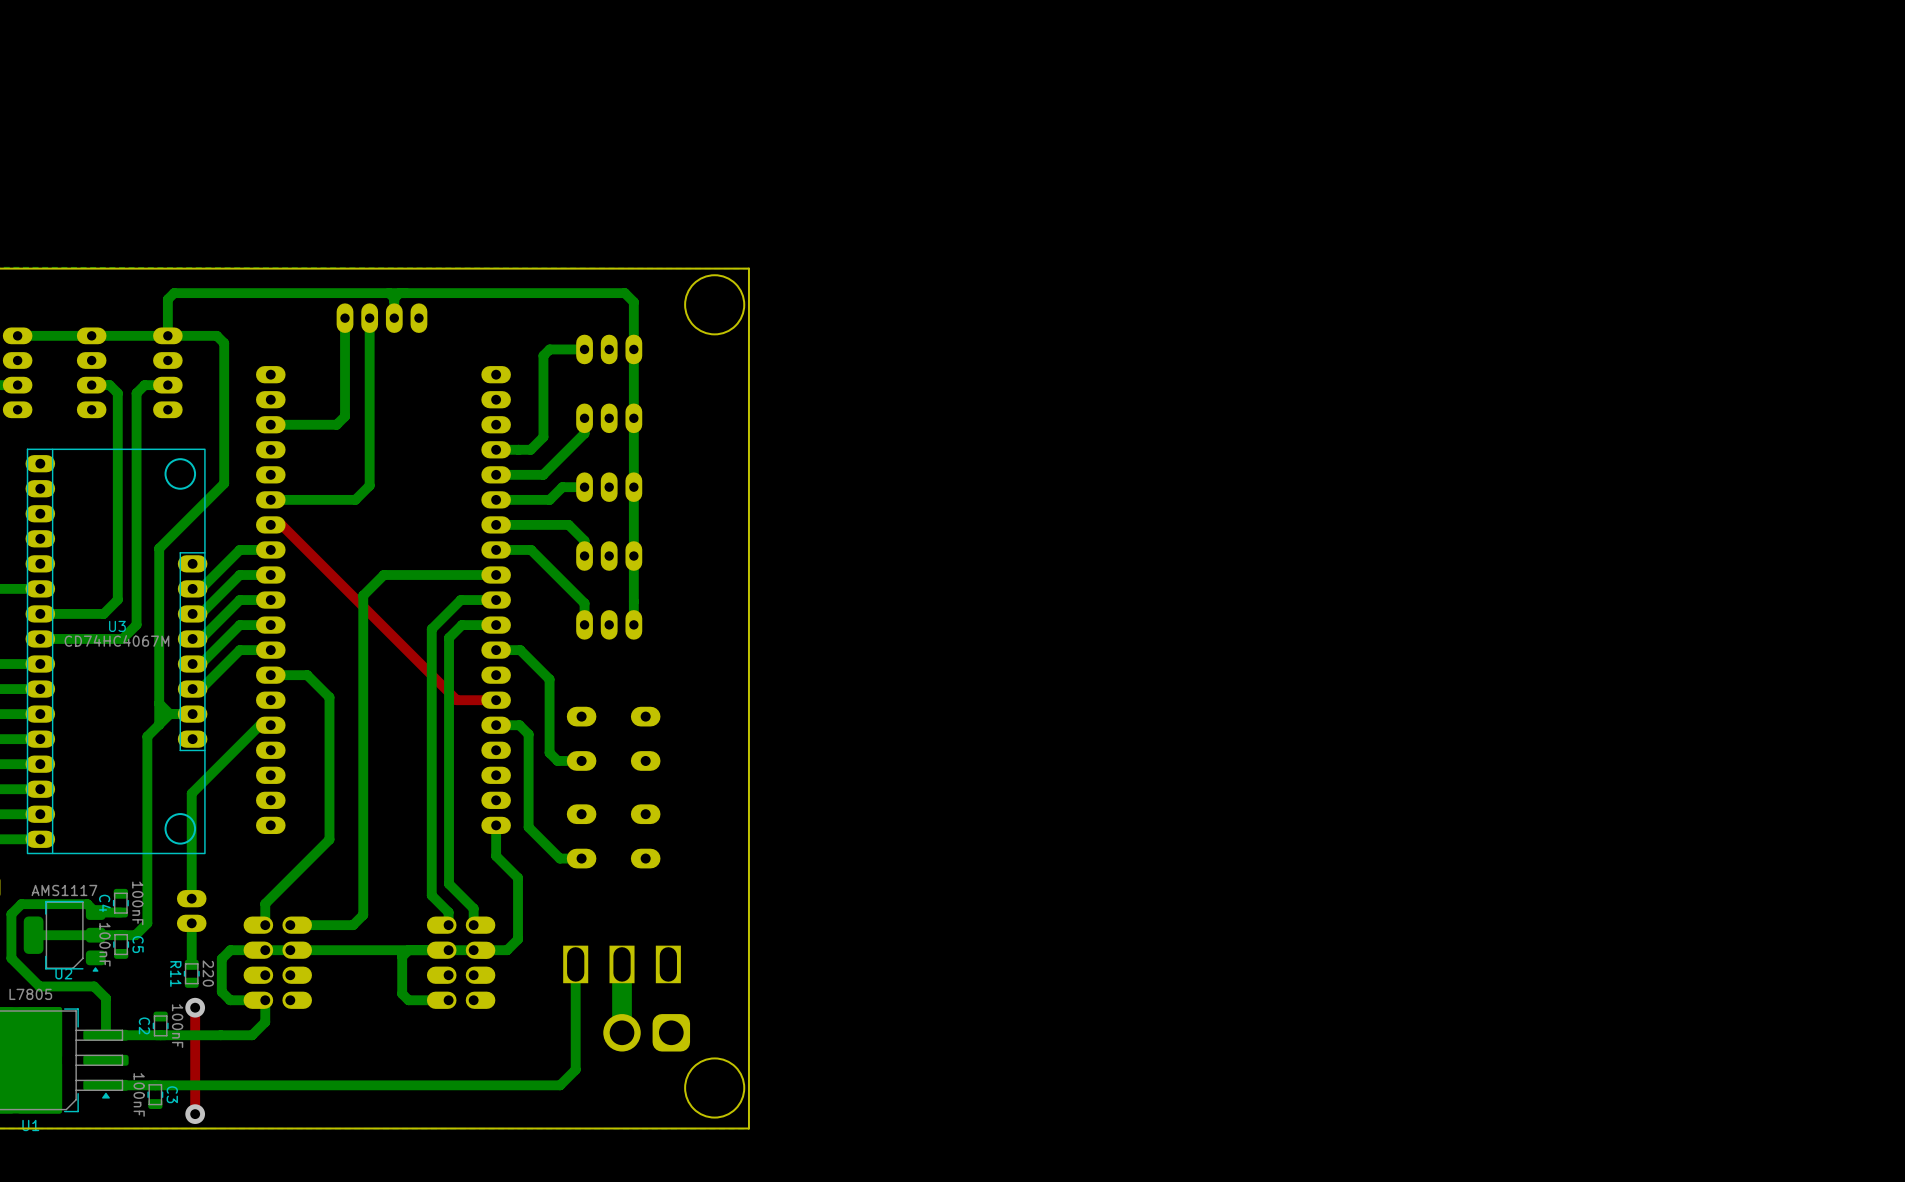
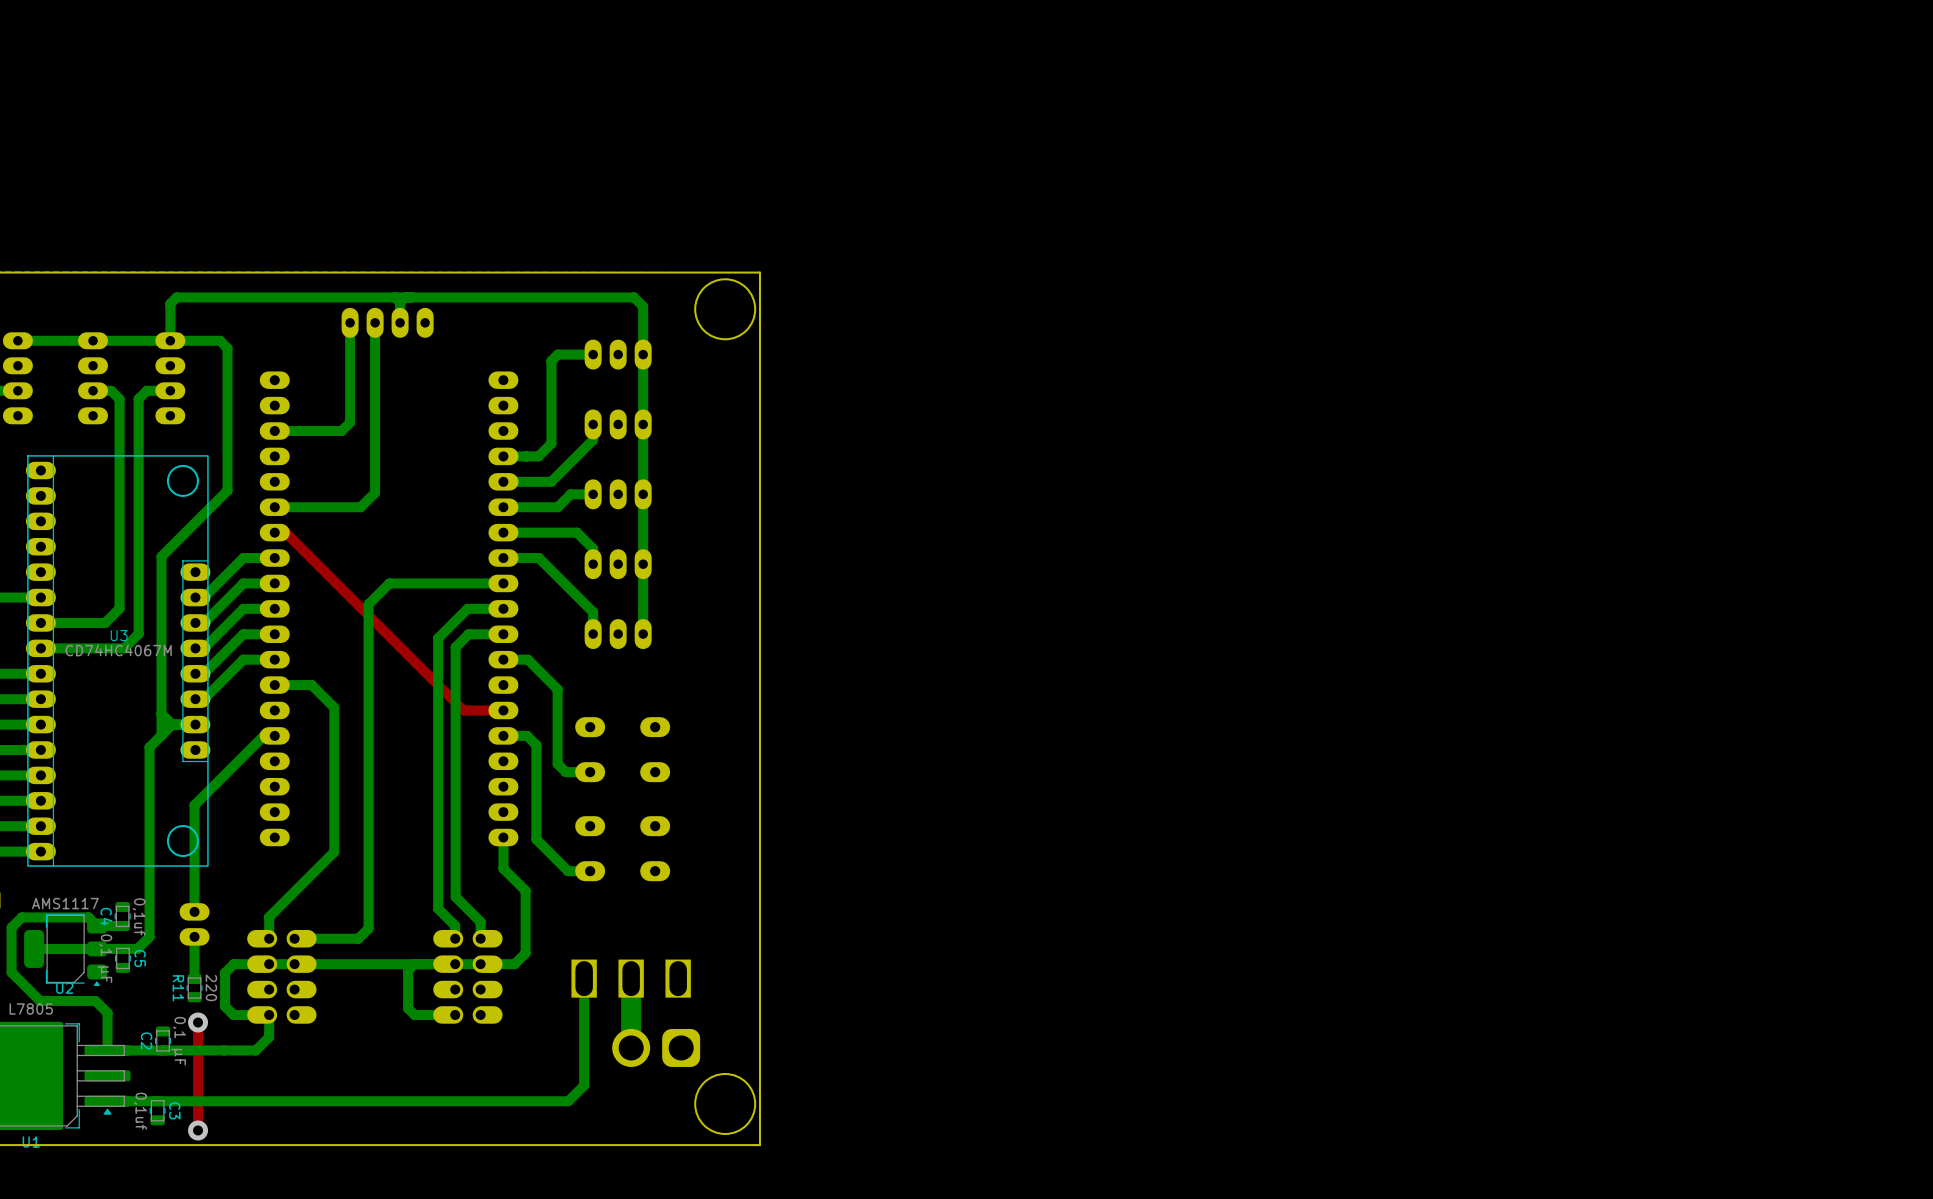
C4 value: 100nF (137, 903) -> 0,1uf (139, 916)
C5 value: 100nF (104, 944) -> 0,1 µF (104, 958)
C2 value: 100nF (177, 1026) -> 0,1 µF (178, 1041)
C3 value: 100nF (139, 1094) -> 0,1uf (140, 1111)

